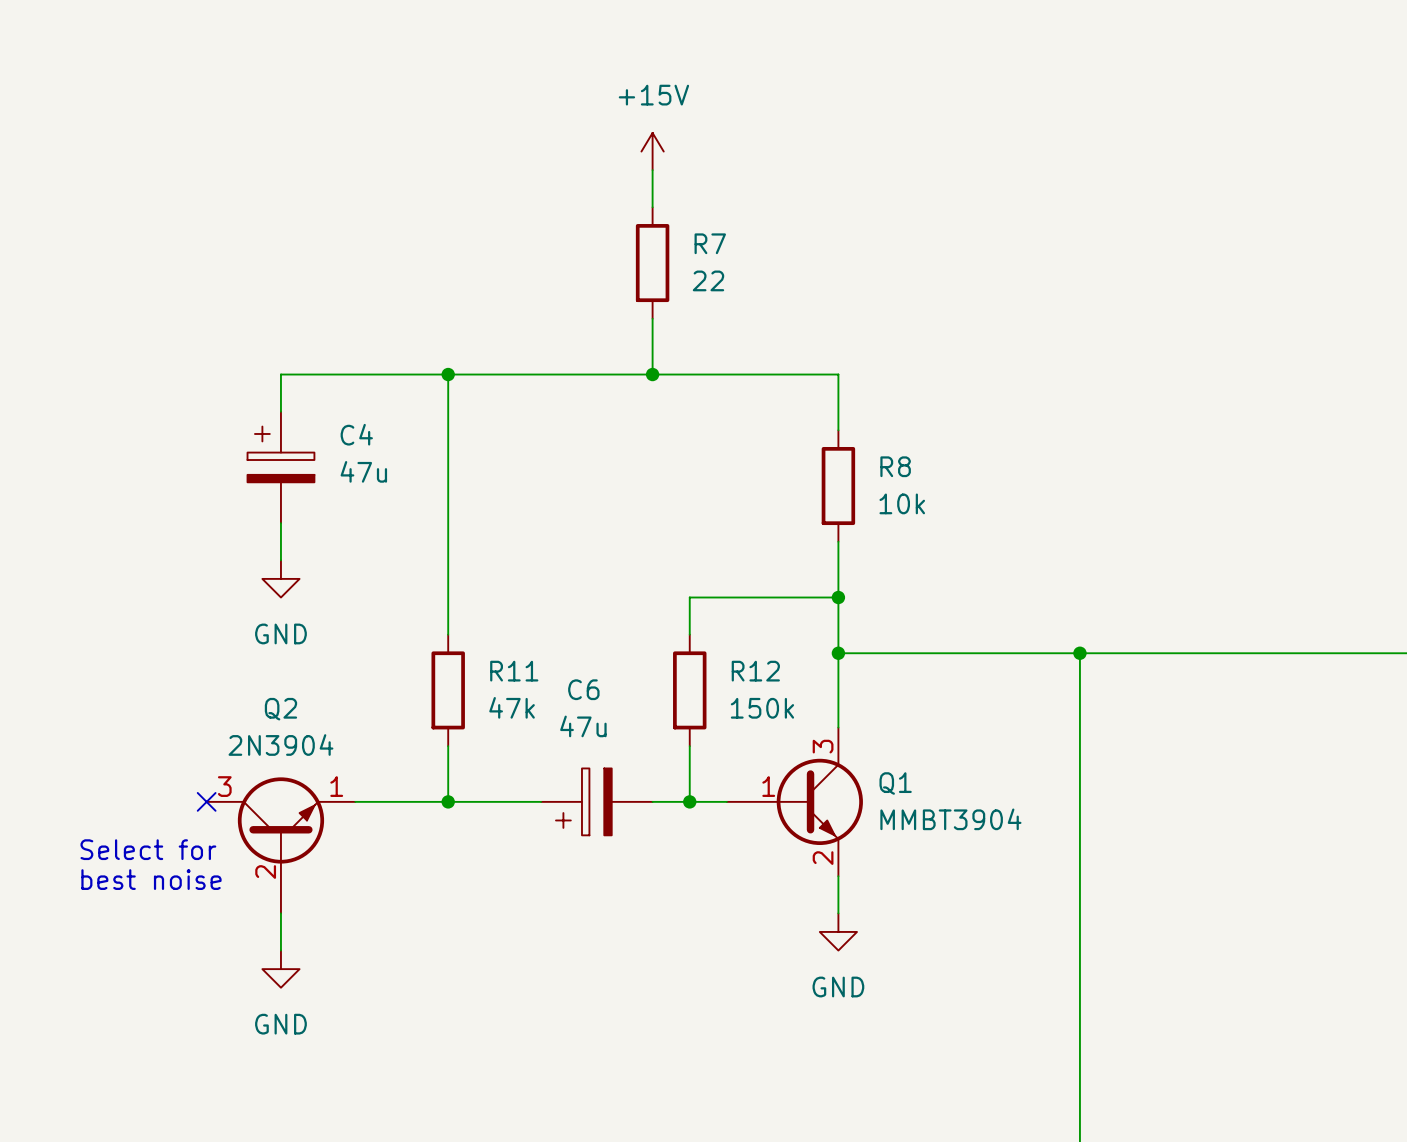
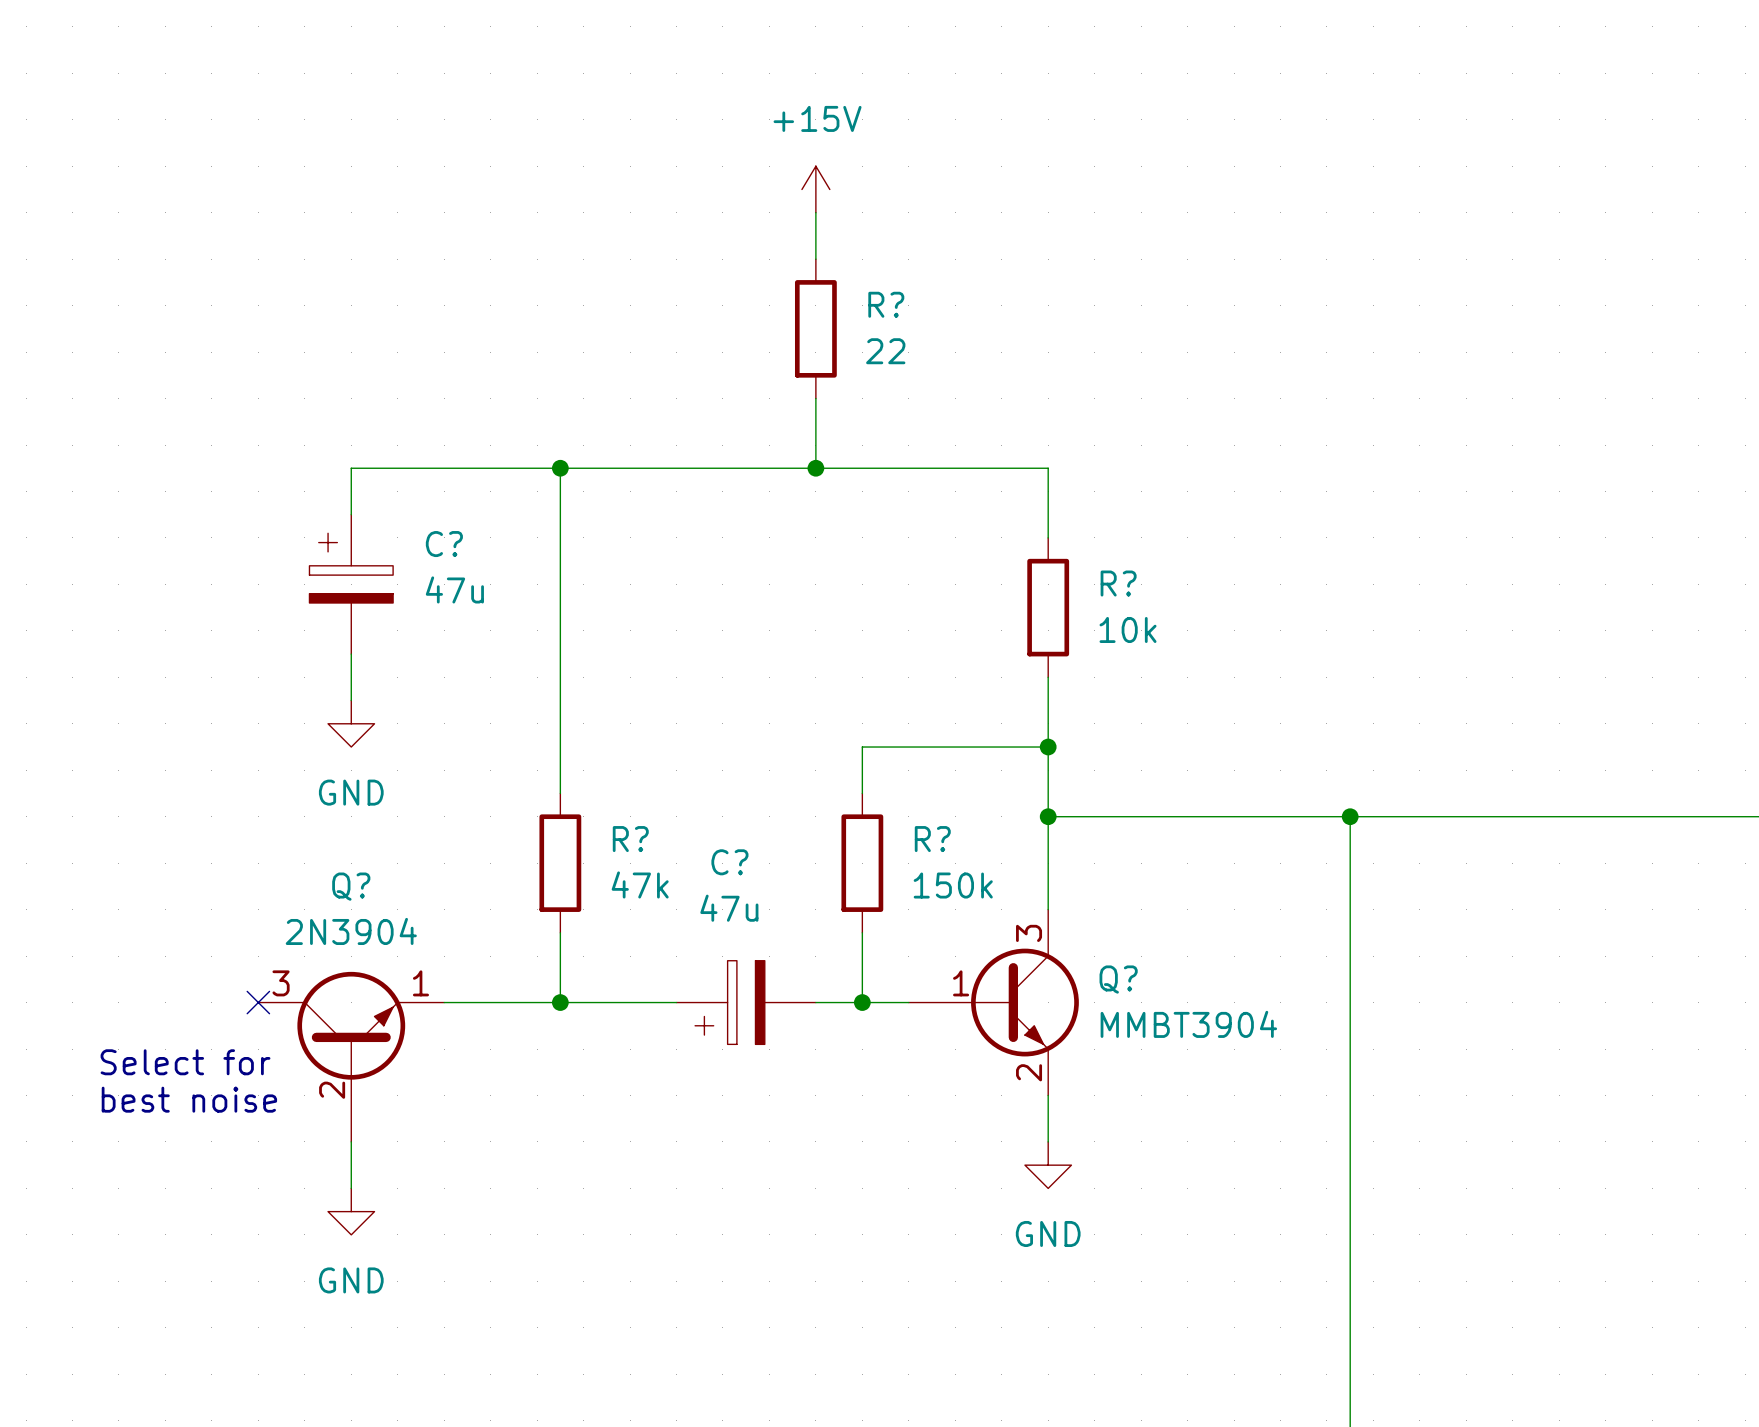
R7 name: R7 (710, 243) -> R? (886, 304)
C4 name: C4 (356, 434) -> C? (444, 544)
R8 name: R8 (895, 466) -> R? (1118, 583)
R11 name: R11 (514, 671) -> R? (630, 839)
R12 name: R12 (755, 671) -> R? (932, 839)
C6 name: C6 (583, 689) -> C? (729, 862)
Q2 name: Q2 (280, 709) -> Q? (351, 886)
Q1 name: Q1 (895, 783) -> Q? (1118, 979)

